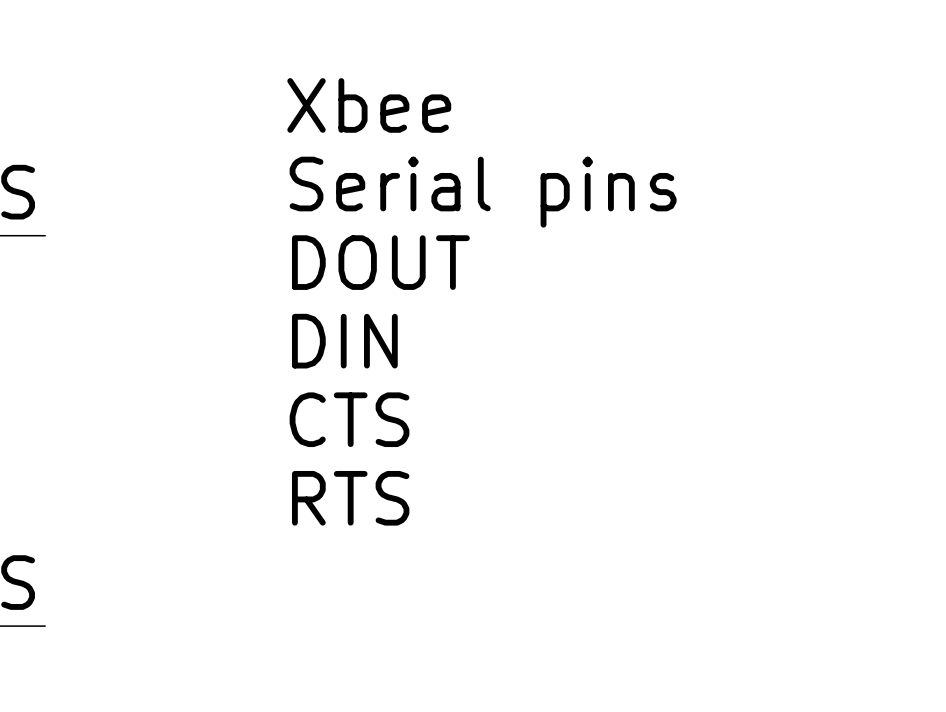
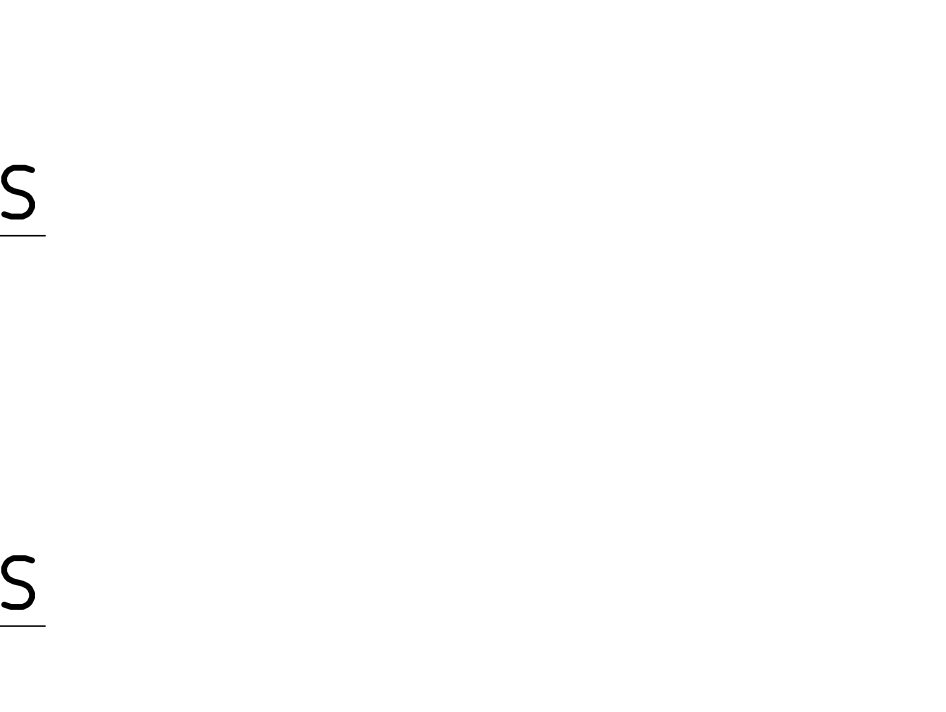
text: Xbee (369, 105) -> none
text: Serial pins (483, 192) -> none
text: DOUT (380, 262) -> none
text: DIN (344, 341) -> none
text: CTS (349, 419) -> none
text: RTS (350, 498) -> none

